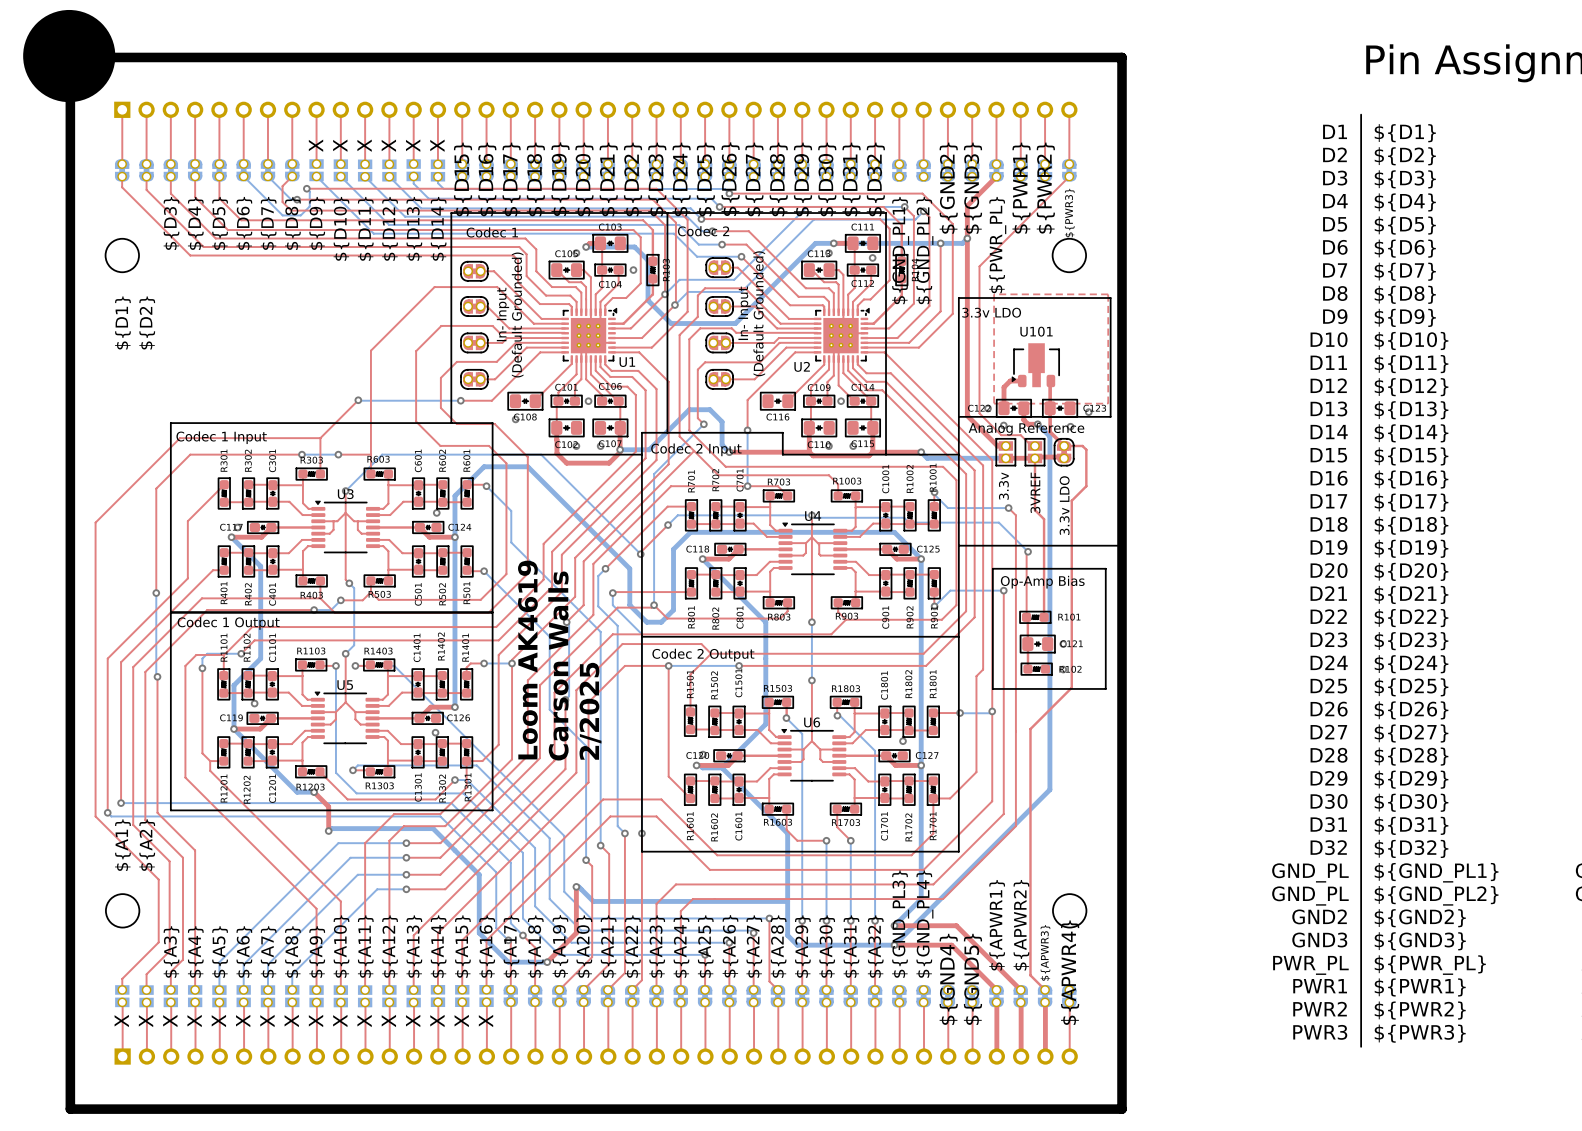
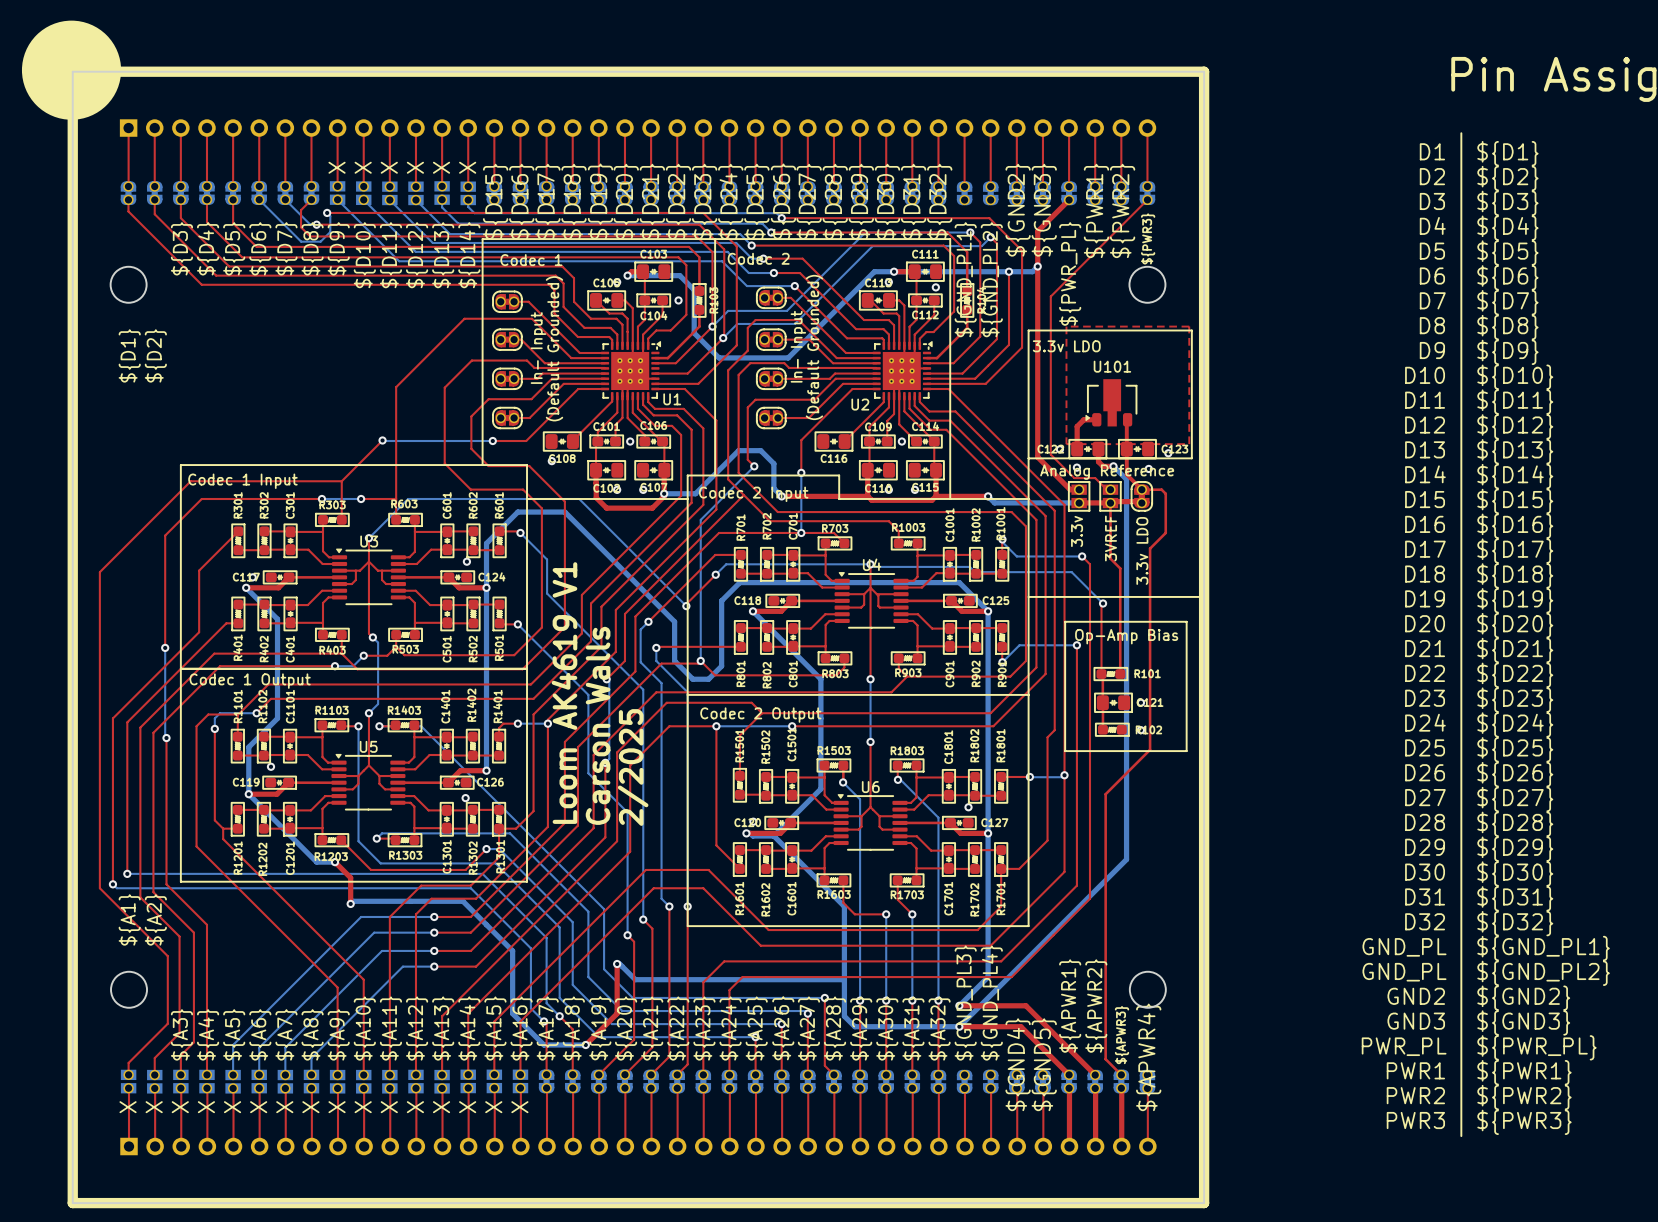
text: Loom AK4619 (527, 660) -> Loom AK4619 V1 (564, 693)

